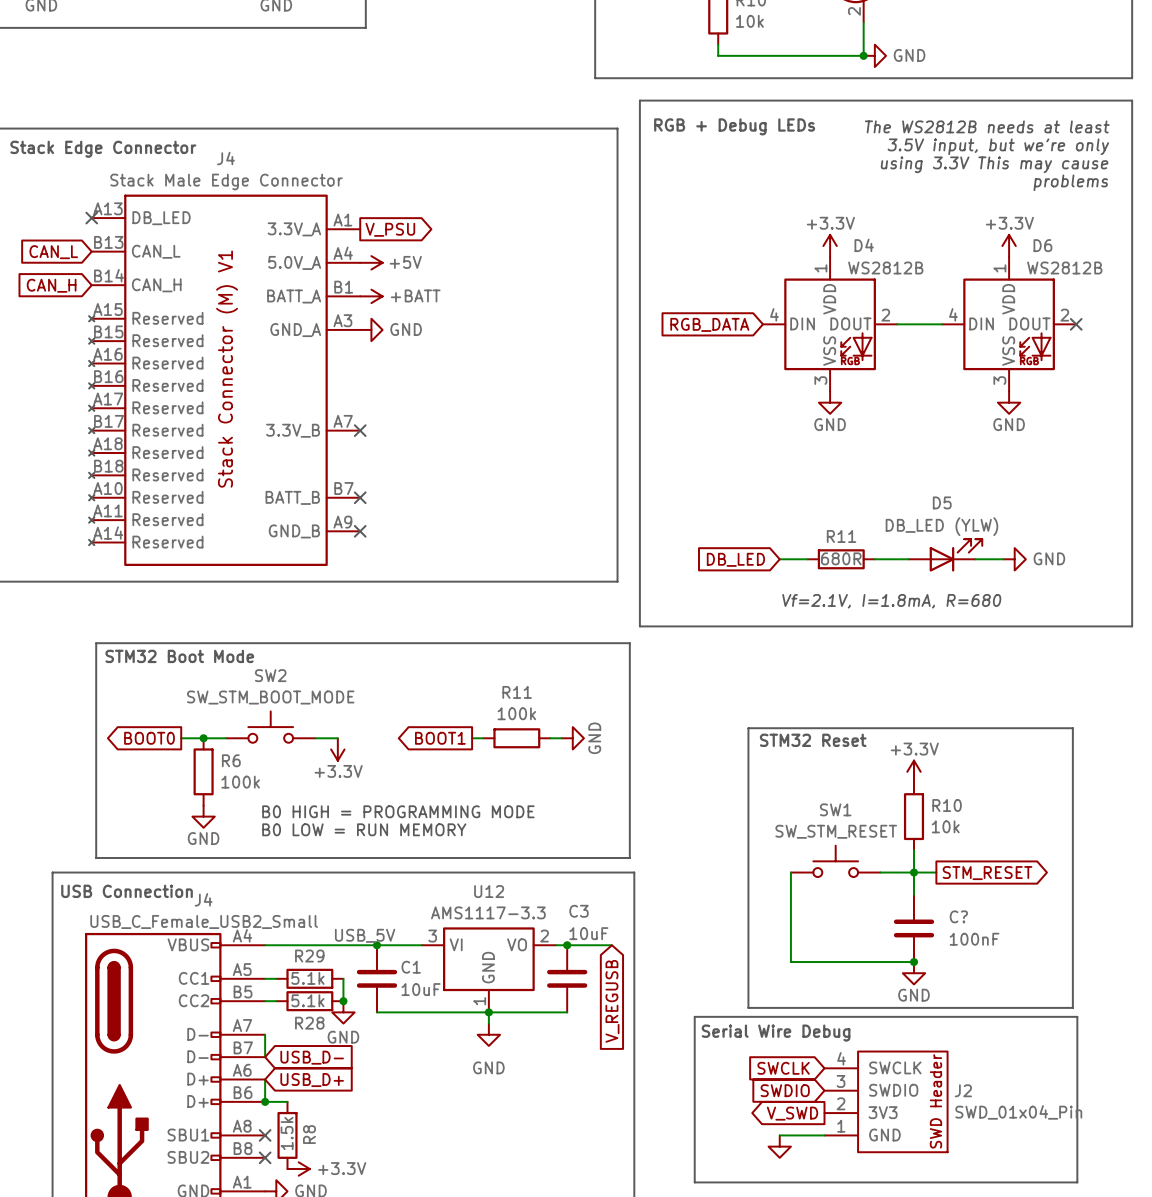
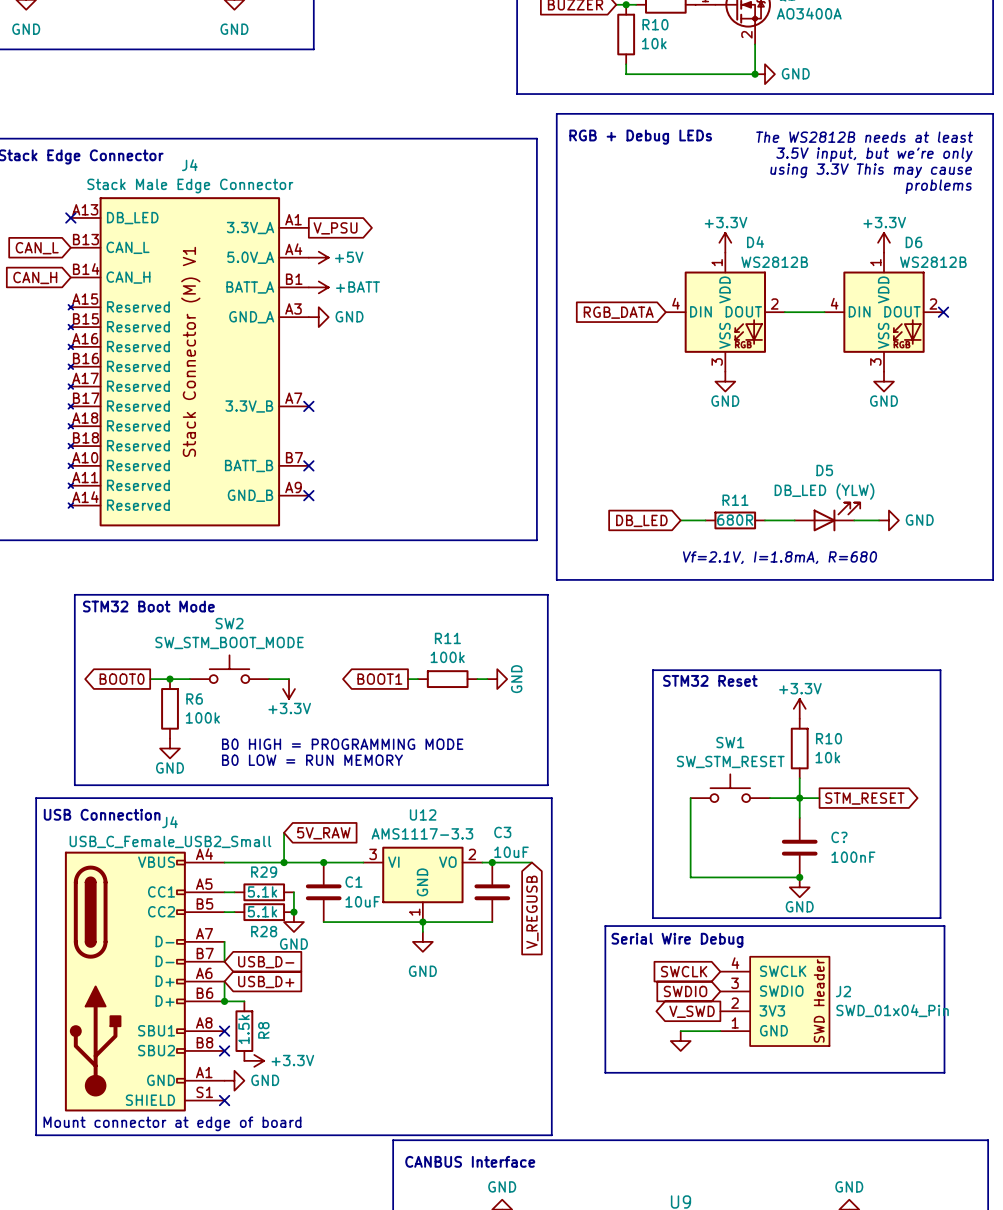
wire: none -> (284, 832) (284, 862)
global label: none -> 5V_RAW (323, 833)
label: USB_5V (365, 935) -> none
junction: none -> (284, 862)

